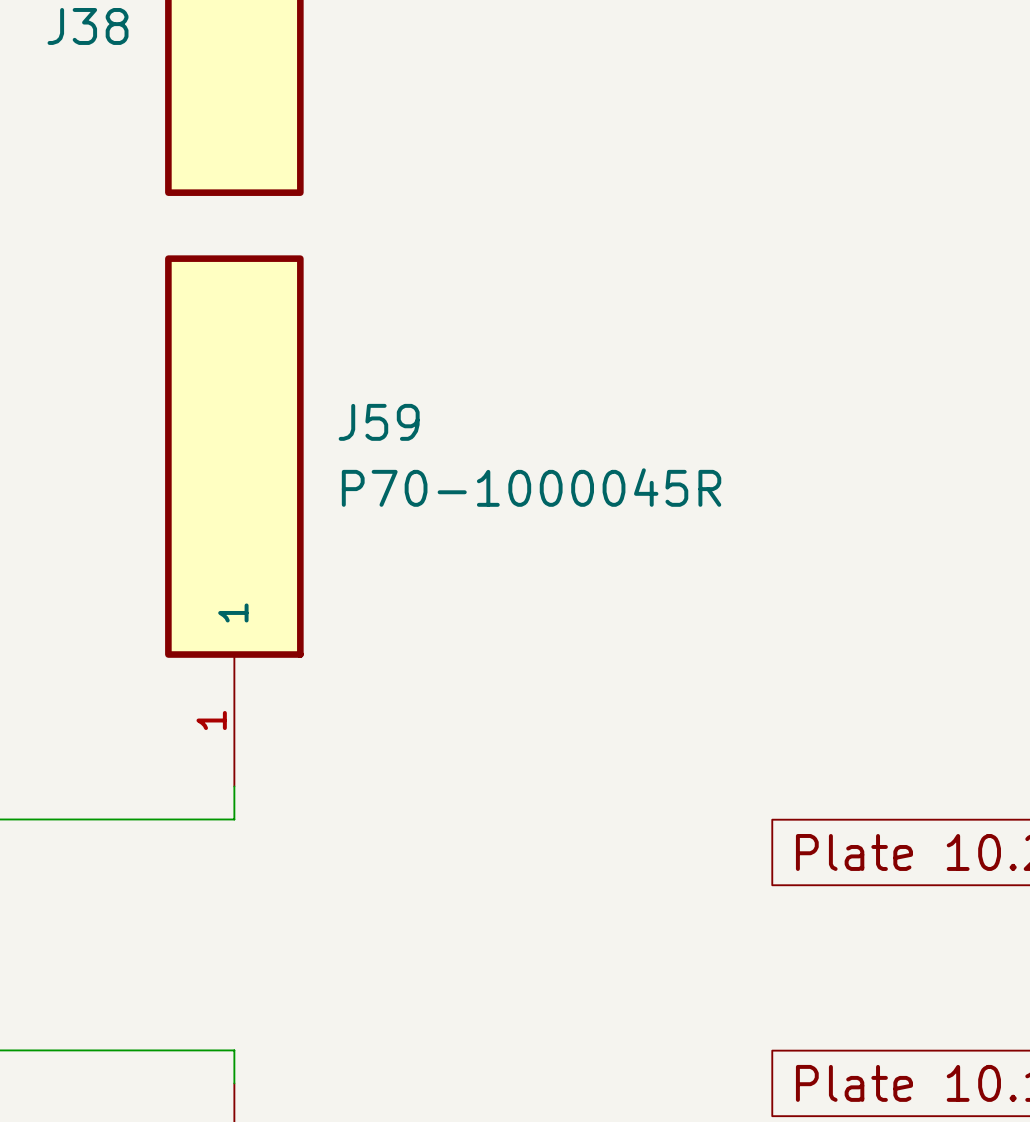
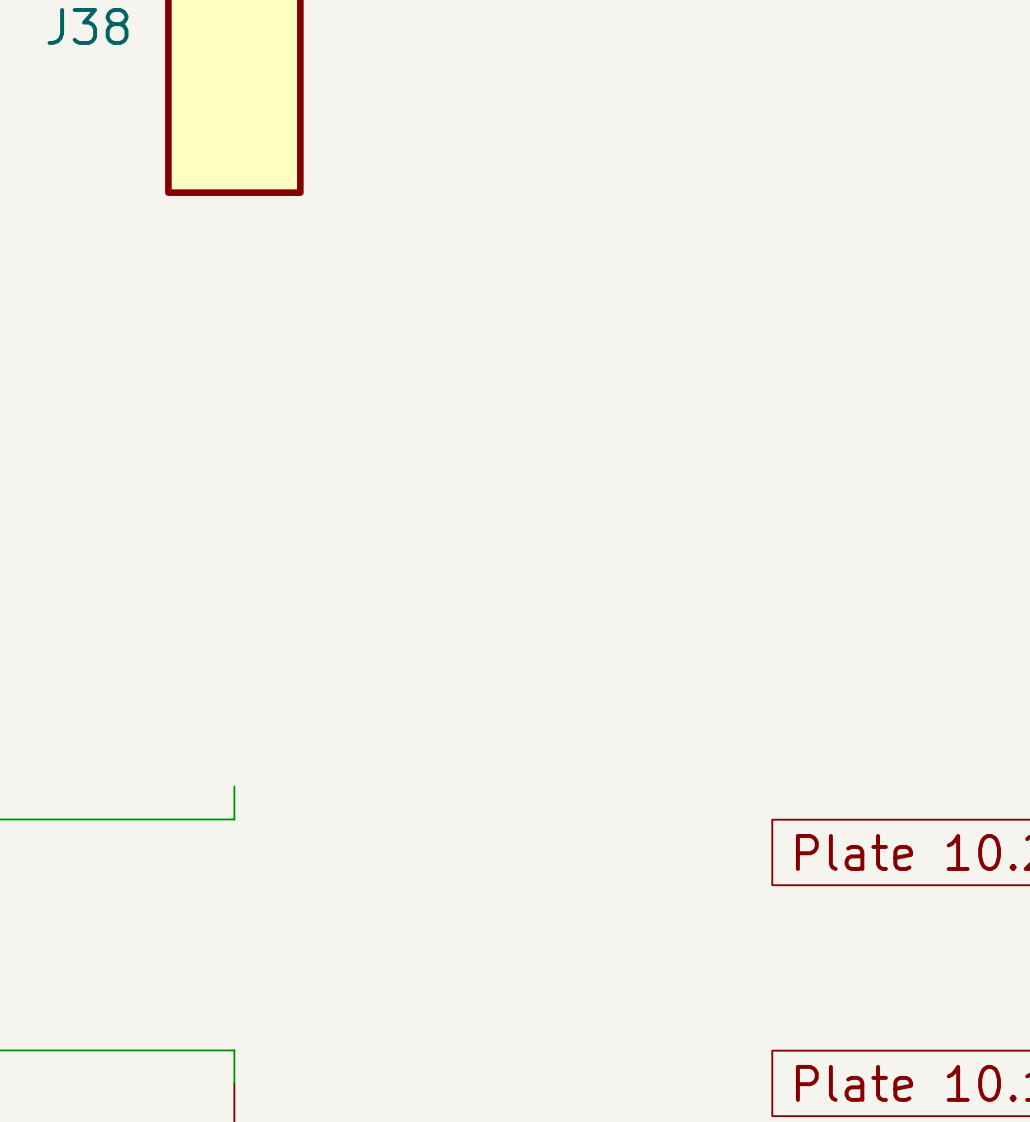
J59: P70-1000045R (234, 520) -> none

